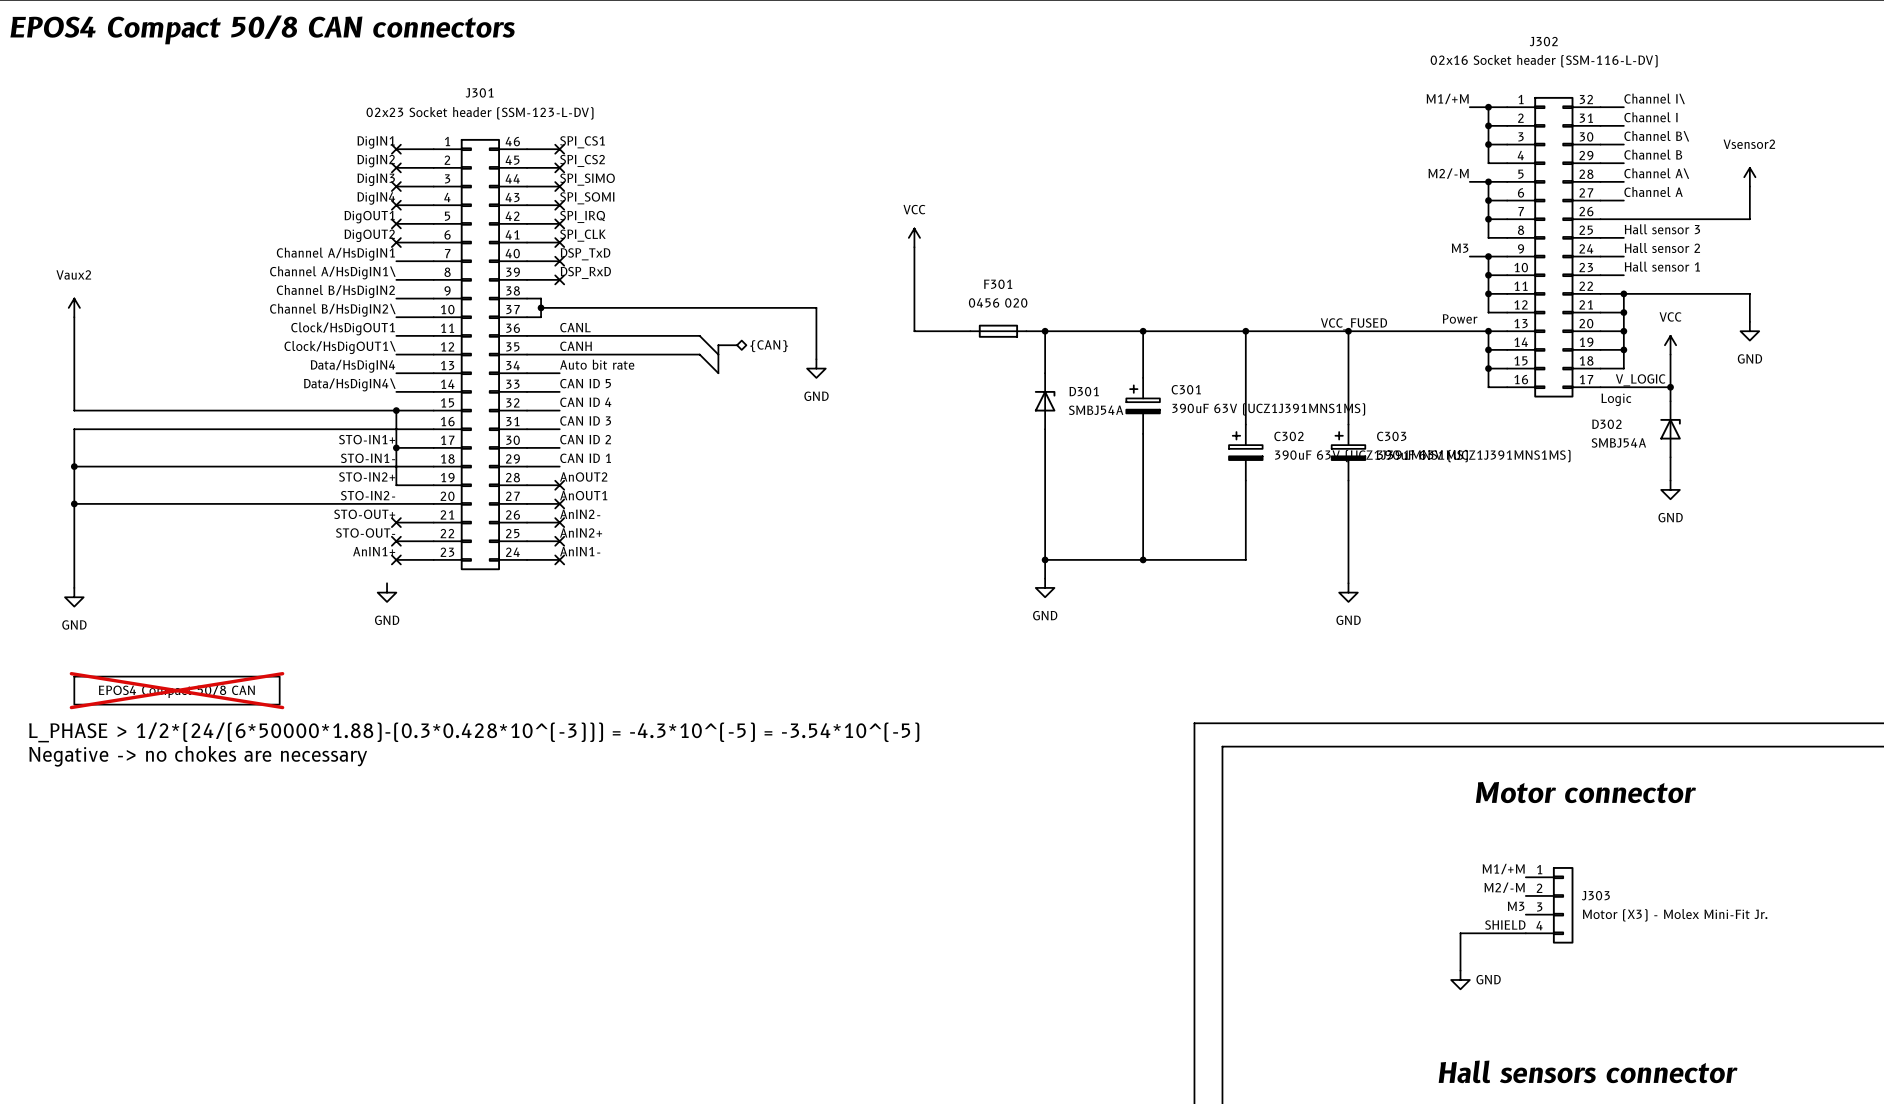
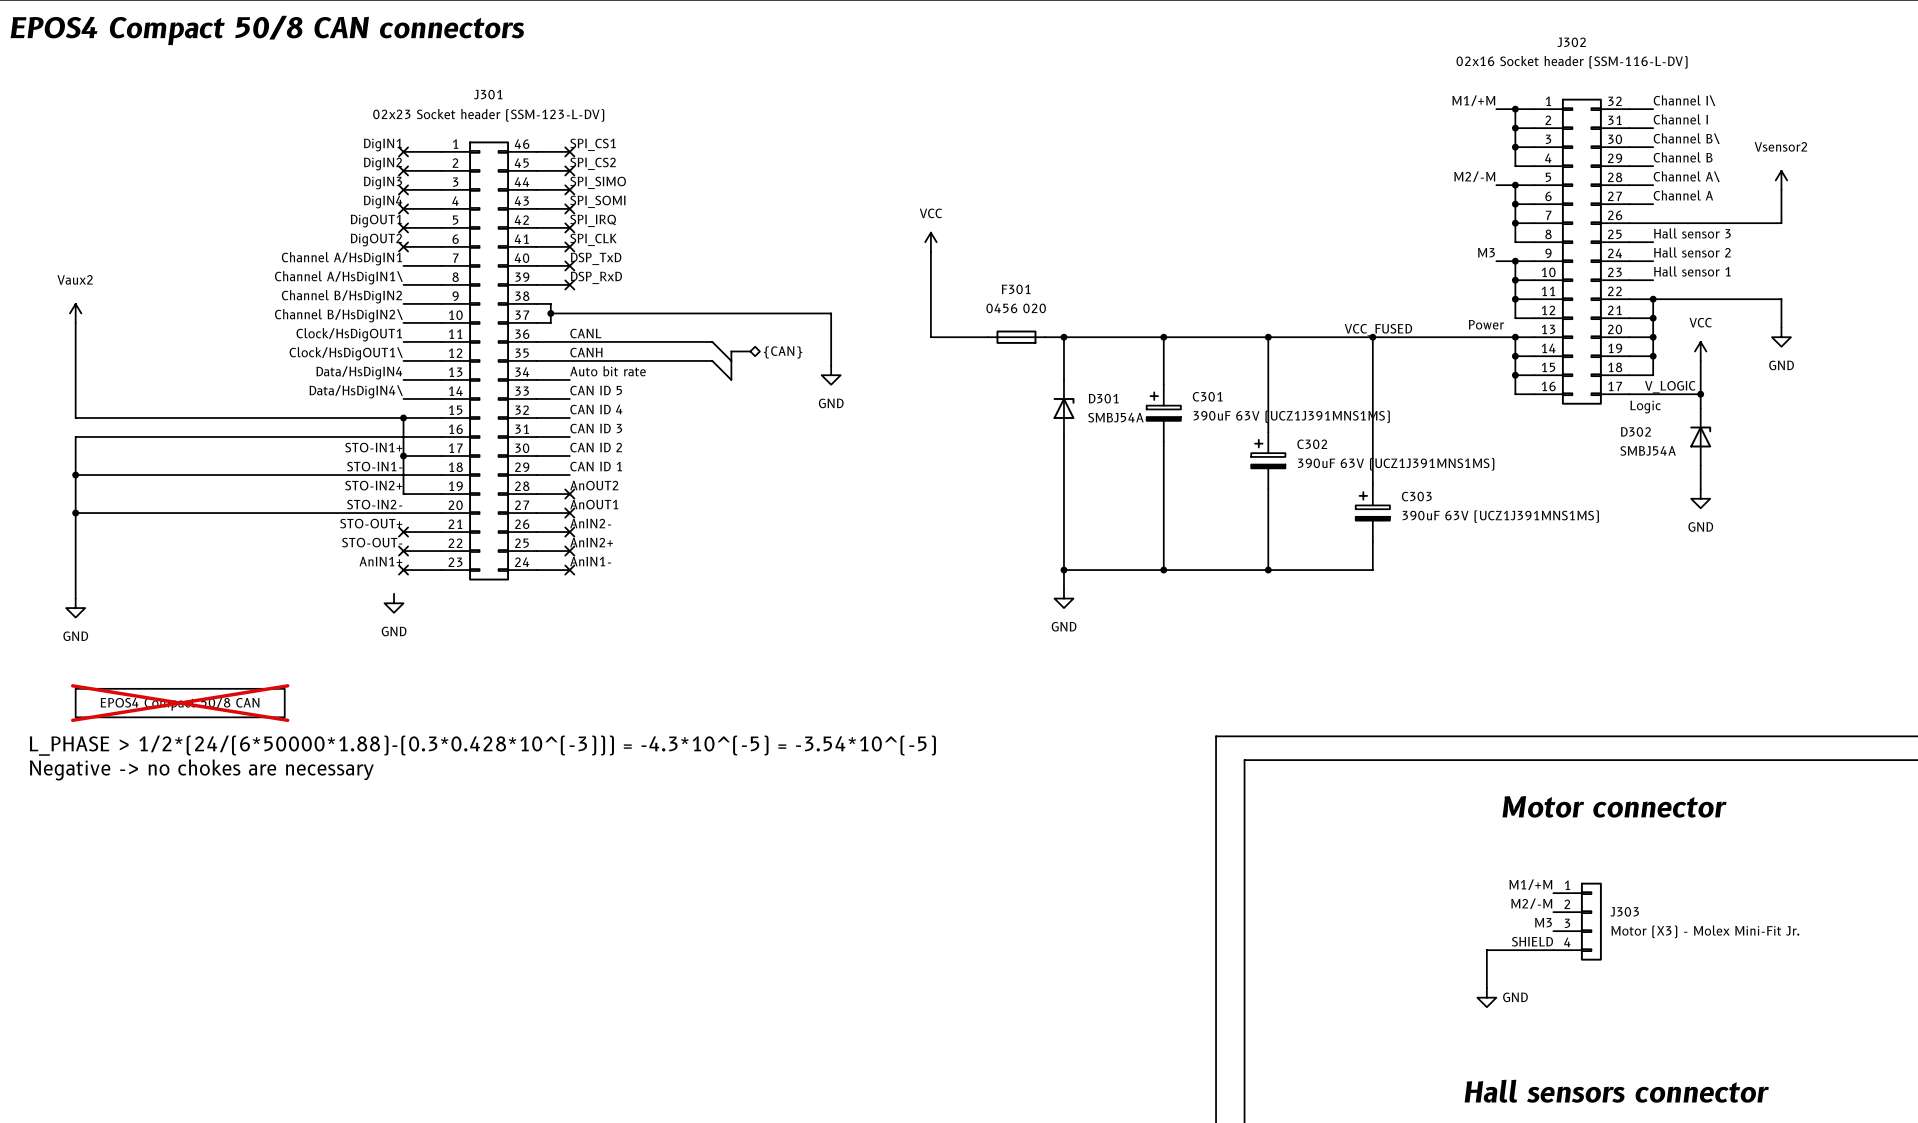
C303 position: (1348, 452) -> (1372, 513)
junction: none -> (1268, 570)
wire: (1348, 559) (1348, 583) -> (1372, 570) (1268, 570)
power symbol: GND (1348, 592) -> none

